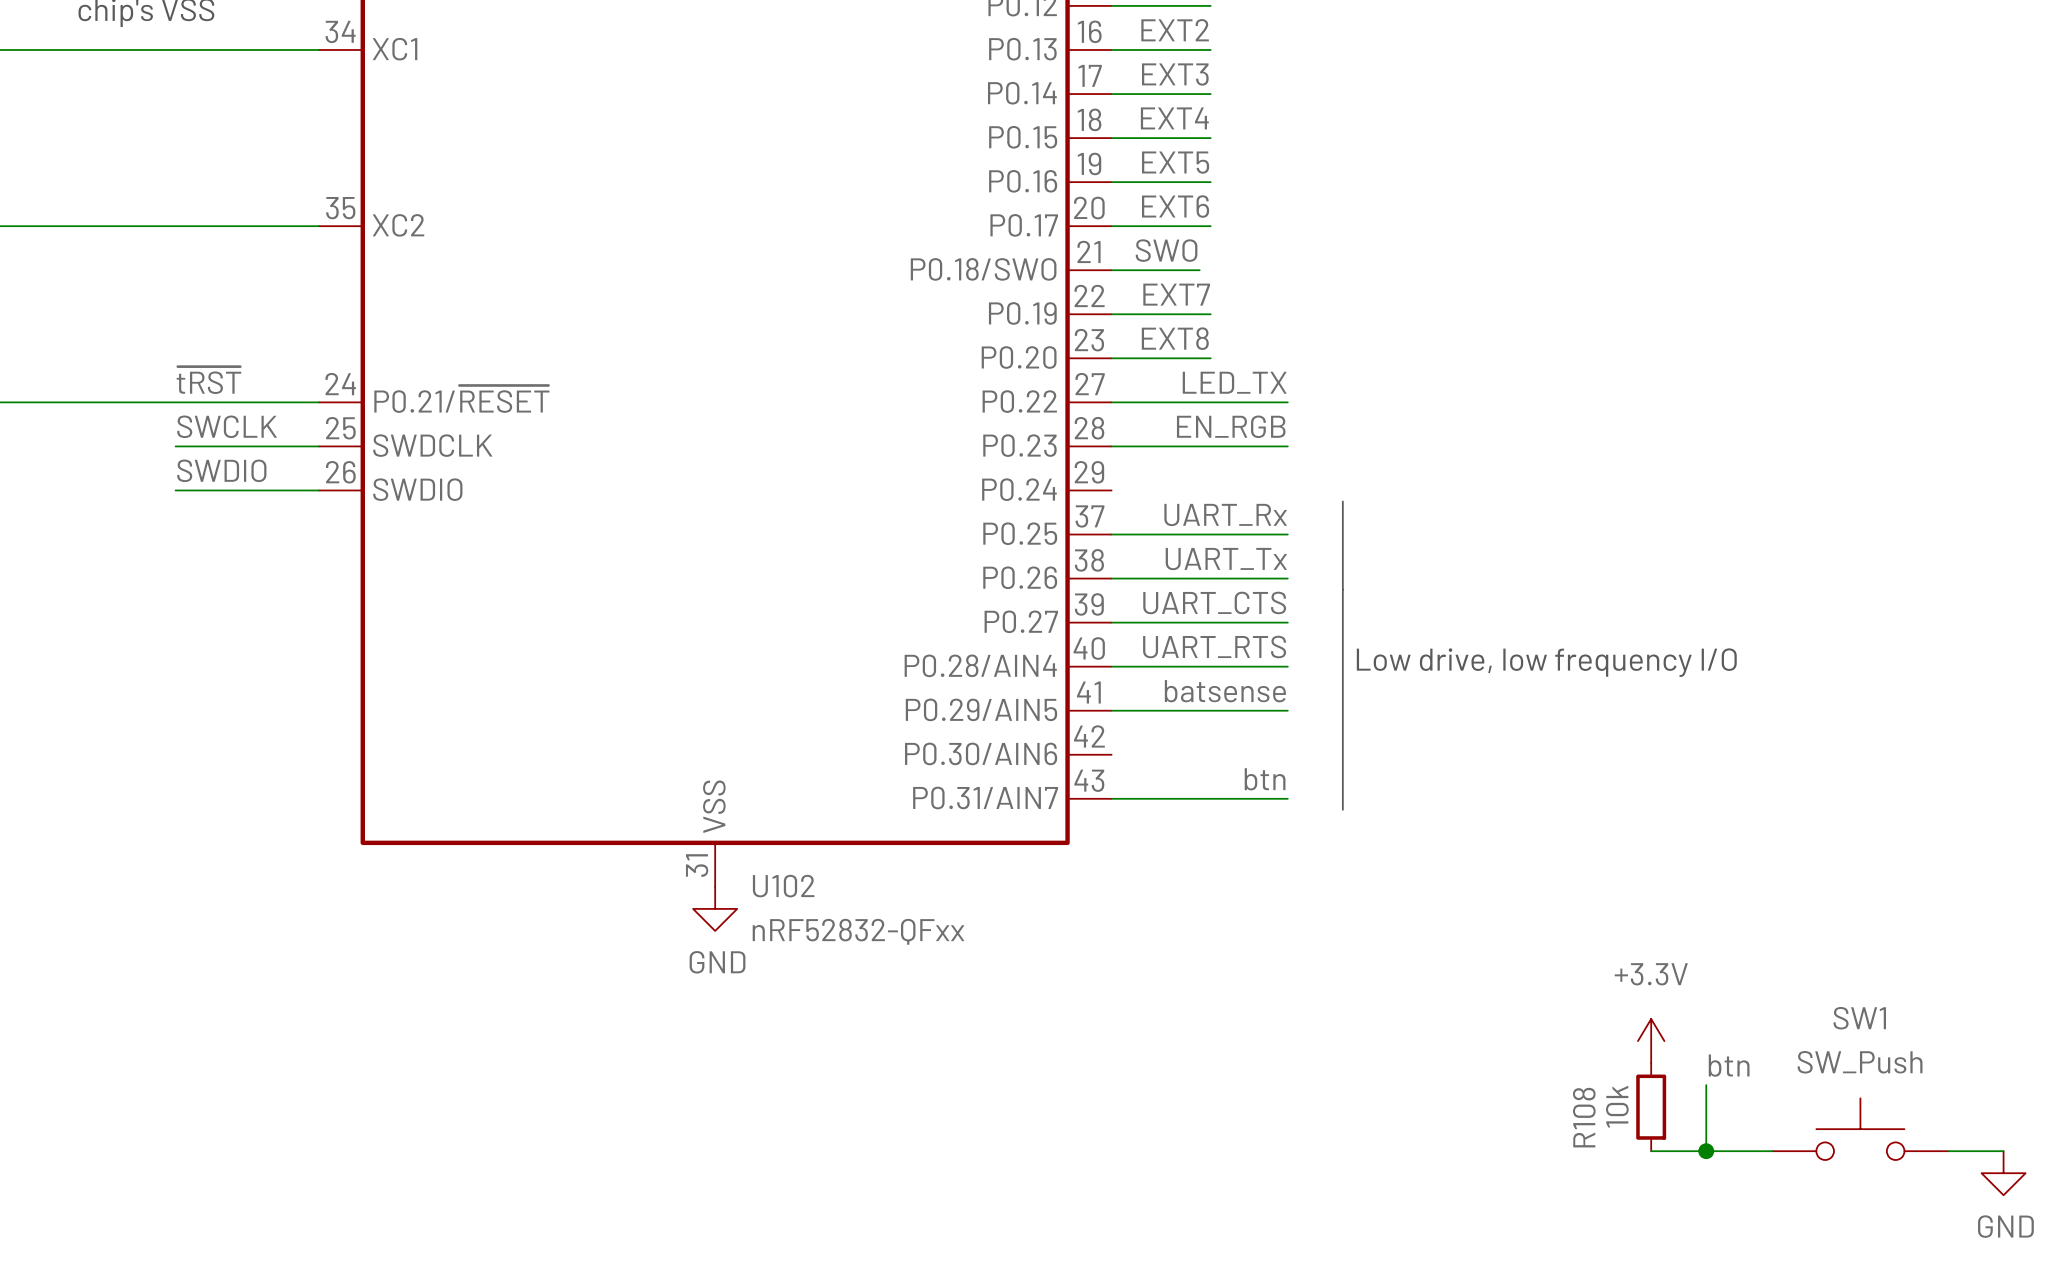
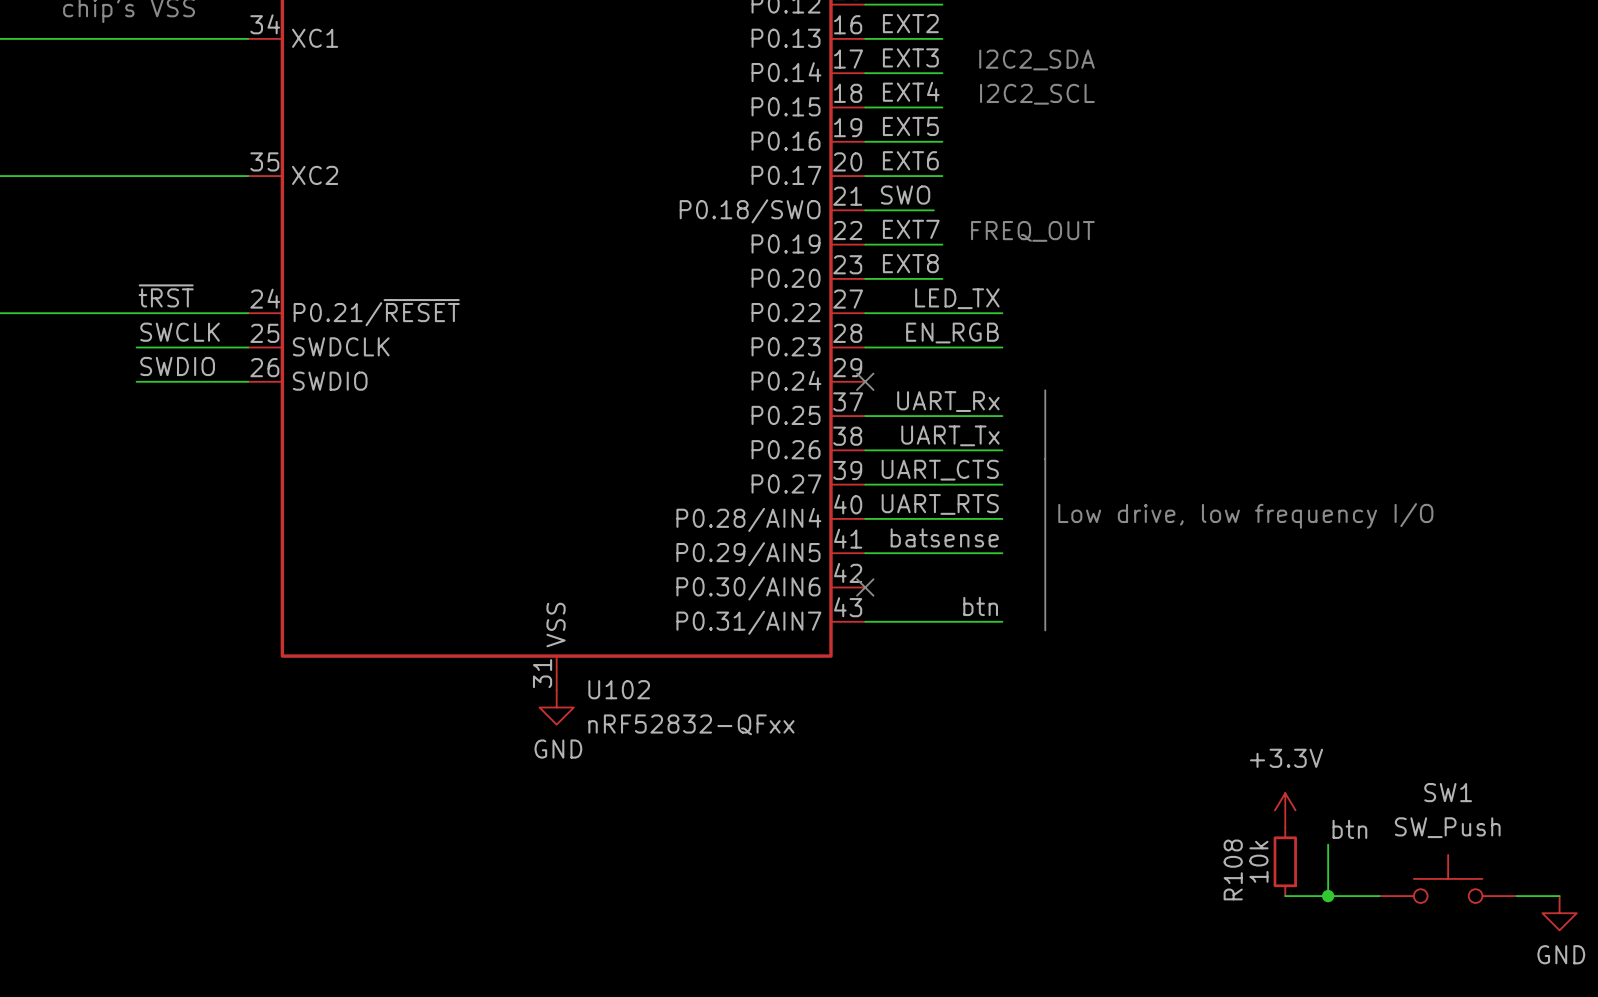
text: none -> I2C2_SDA (1036, 59)
text: none -> I2C2_SCL (1037, 94)
text: none -> FREQ_OUT (1032, 231)
no-connect mark: none -> (865, 381)
no-connect mark: none -> (865, 587)

